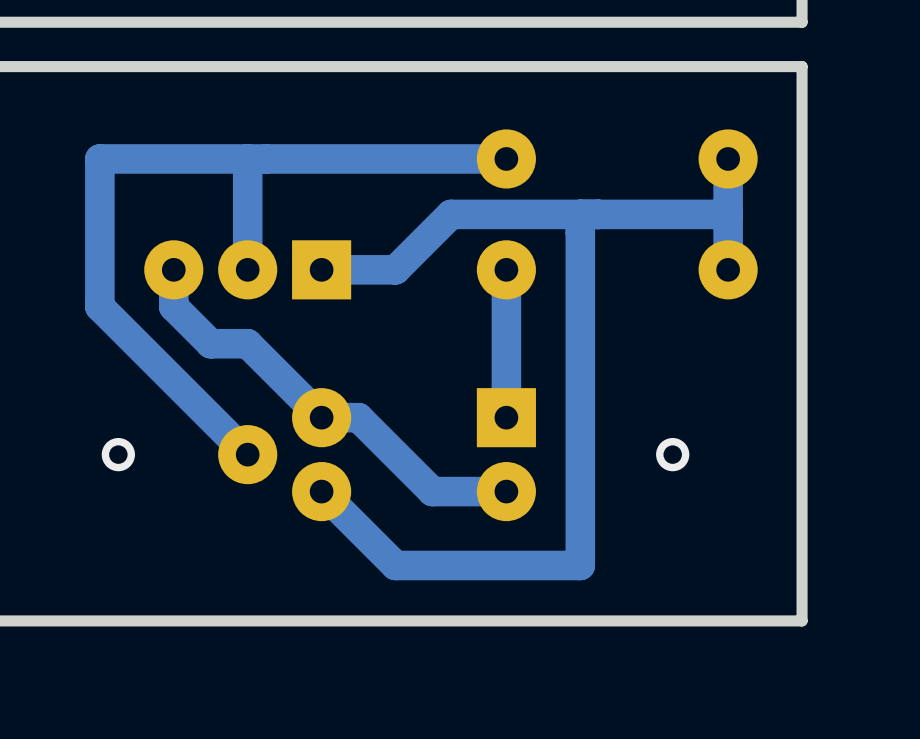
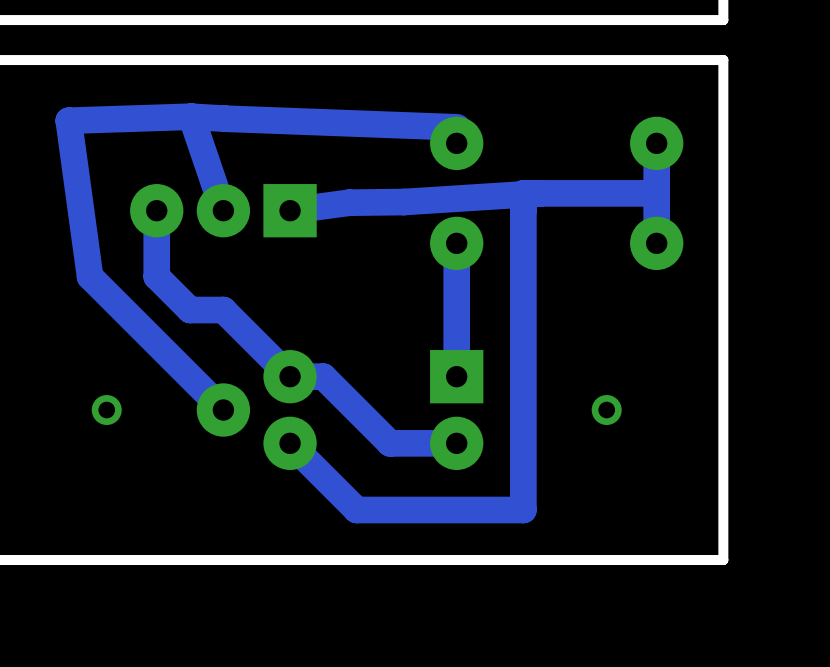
bottom track: none -> (191, 116) (457, 127)
bottom track: none -> (191, 116) (223, 210)
bottom track: (247, 158) (247, 269) -> none
bottom track: (506, 158) (99, 158) (99, 306) -> (191, 116) (68, 120) (90, 276)
bottom track: (580, 214) (450, 214) (395, 269) (321, 269) -> none
bottom track: none -> (540, 193) (404, 202) (349, 202) (290, 210)
part position: (247, 269) -> (223, 210)

